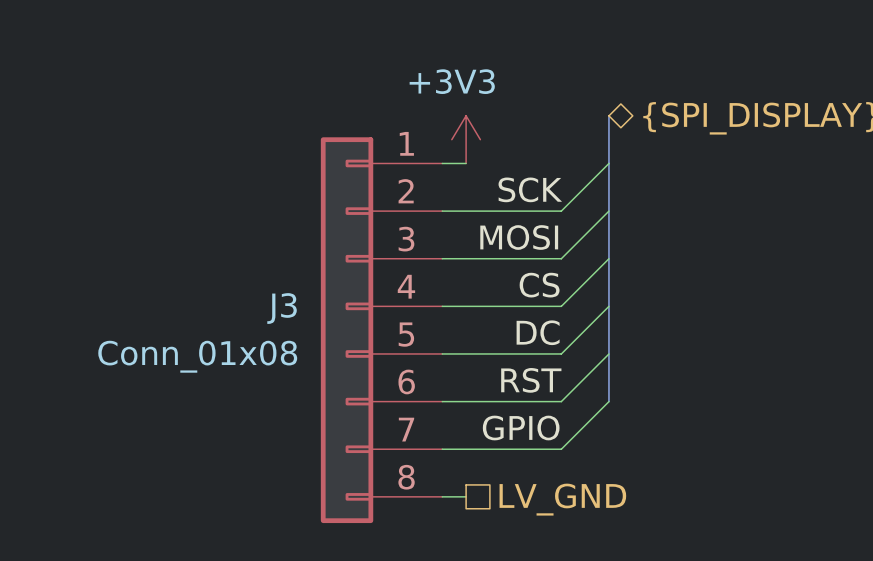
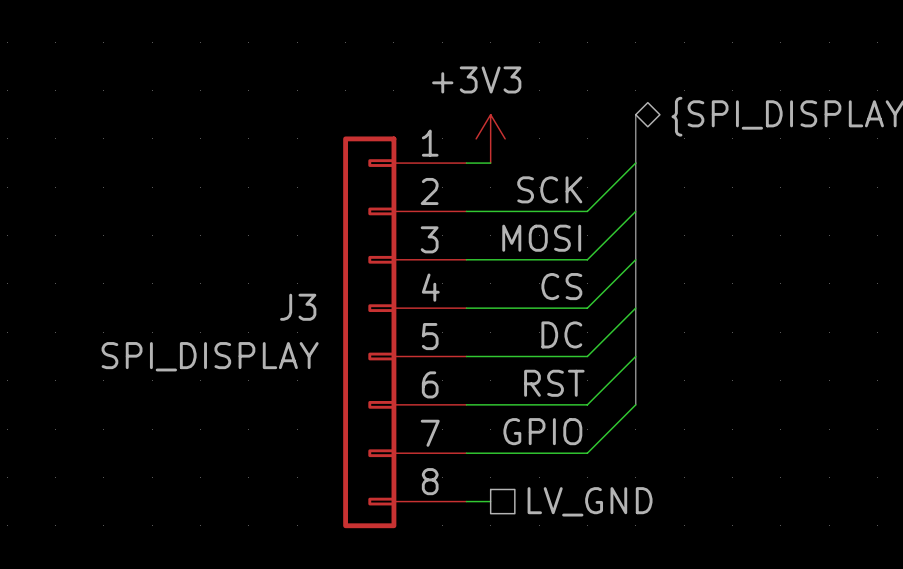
J3 value: Conn_01x08 (197, 356) -> SPI_DISPLAY (210, 356)

